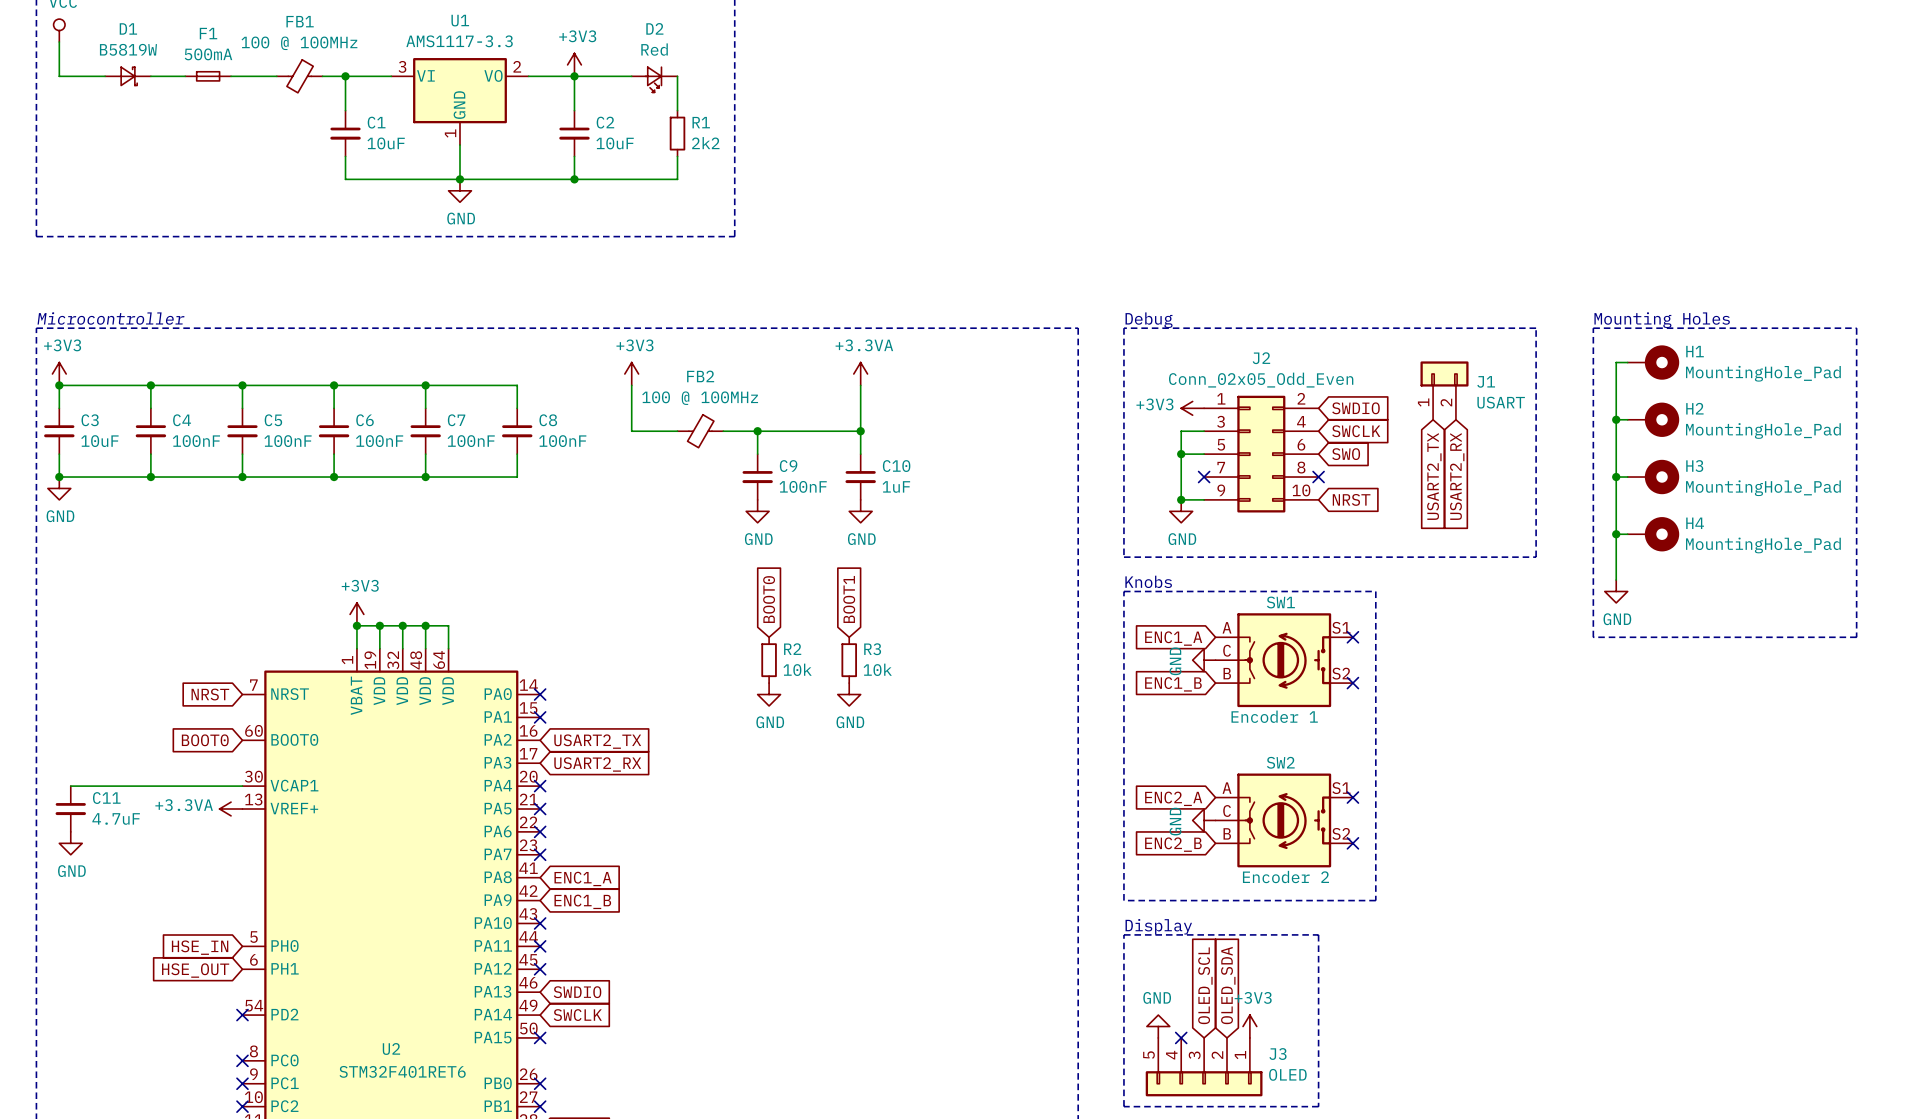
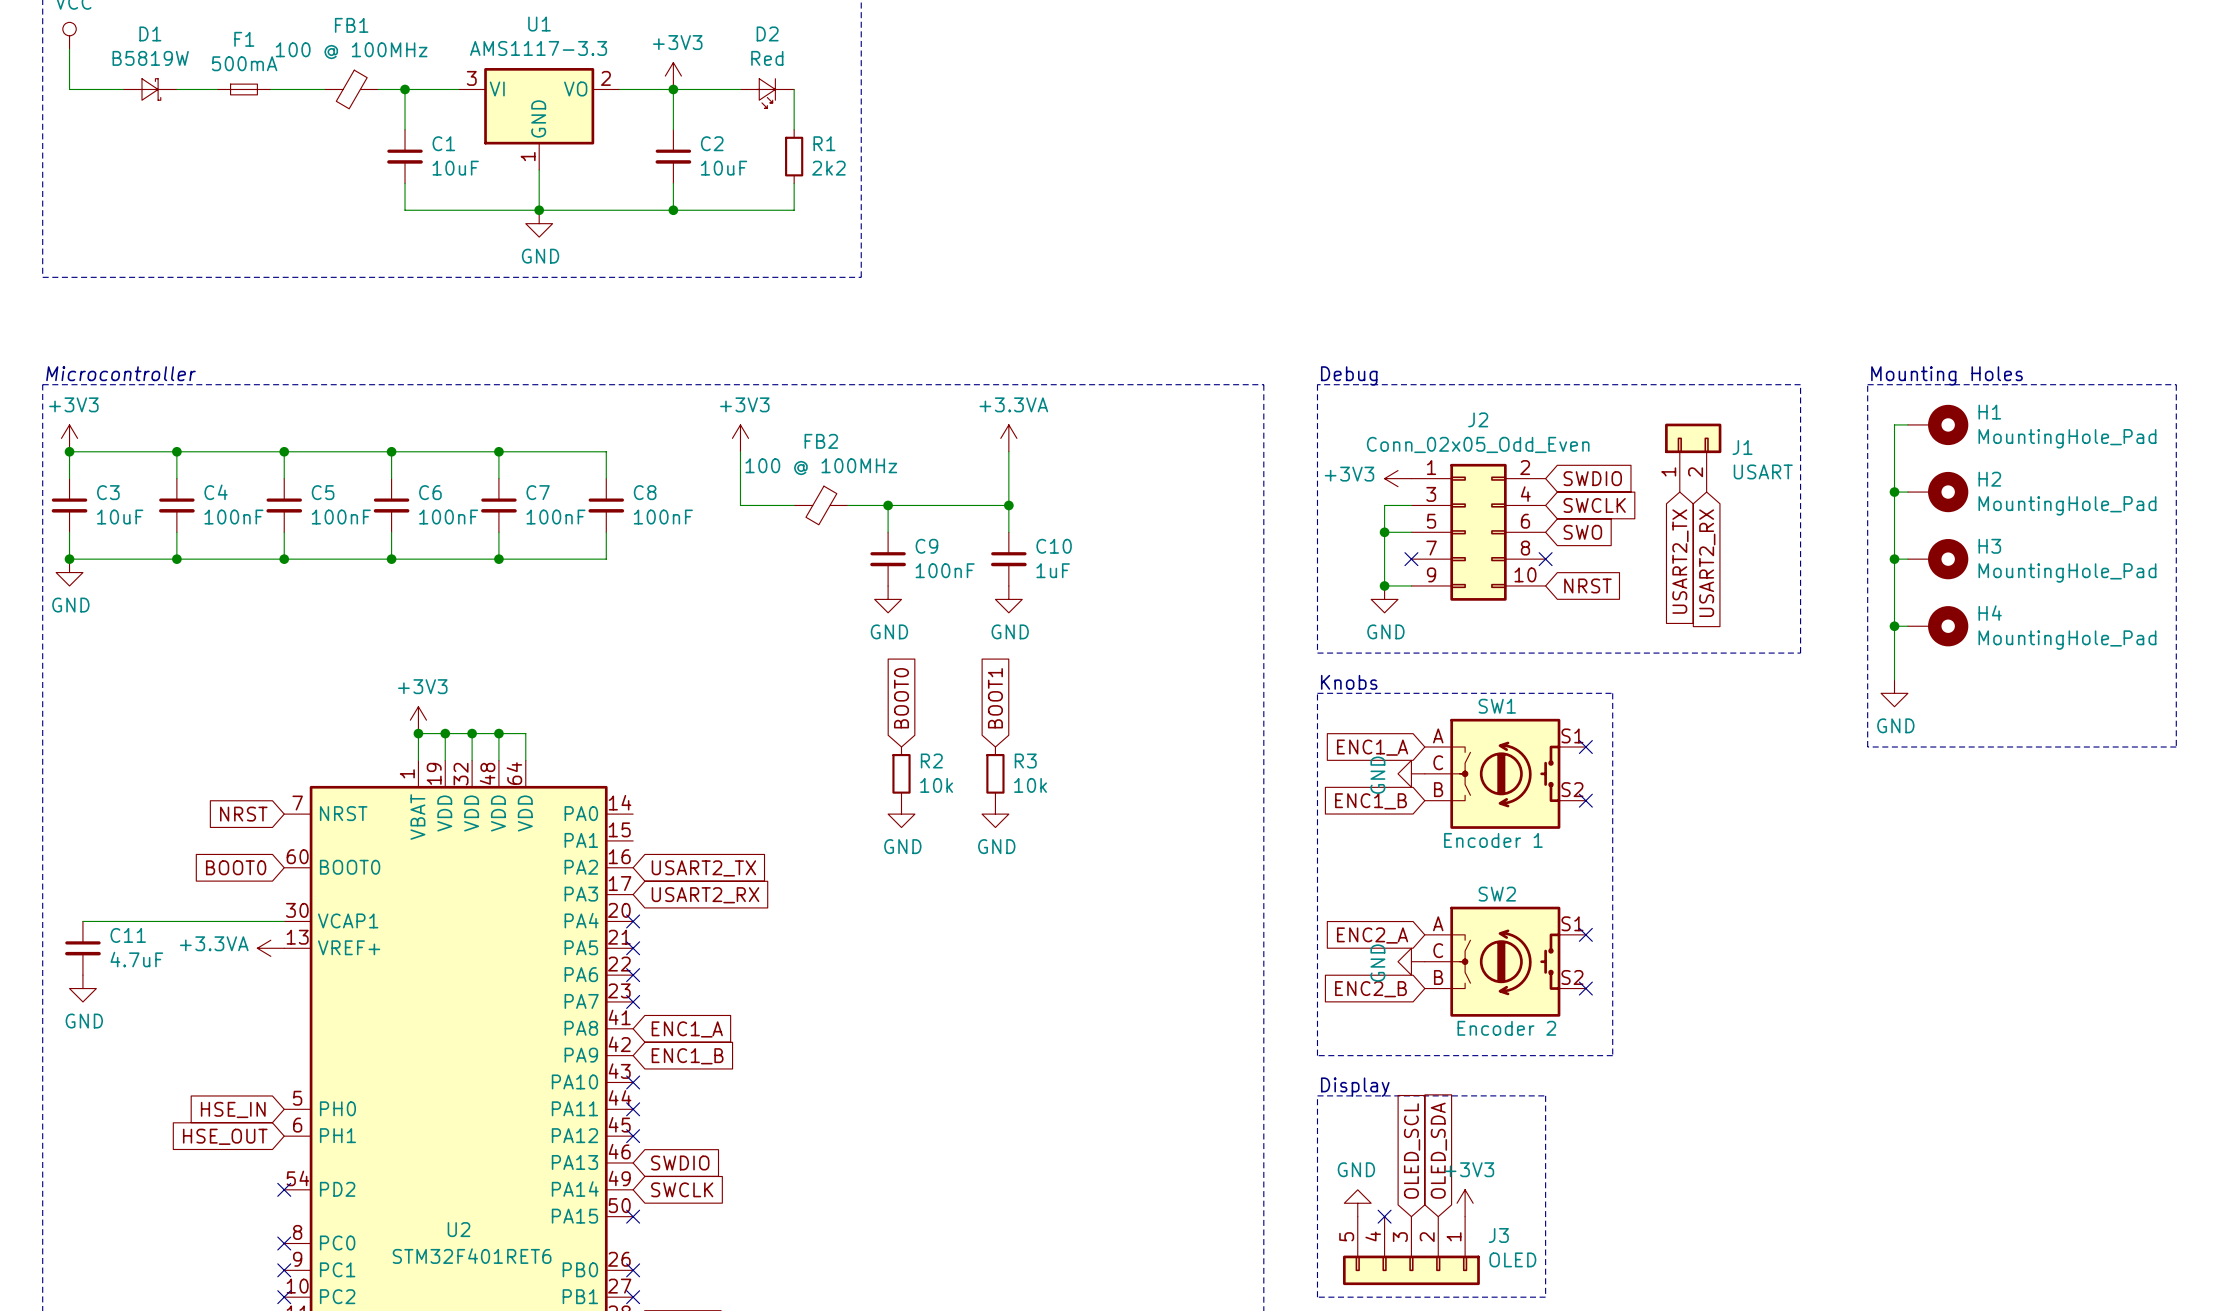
no-connect mark: (540, 694) -> none
no-connect mark: (540, 717) -> none

